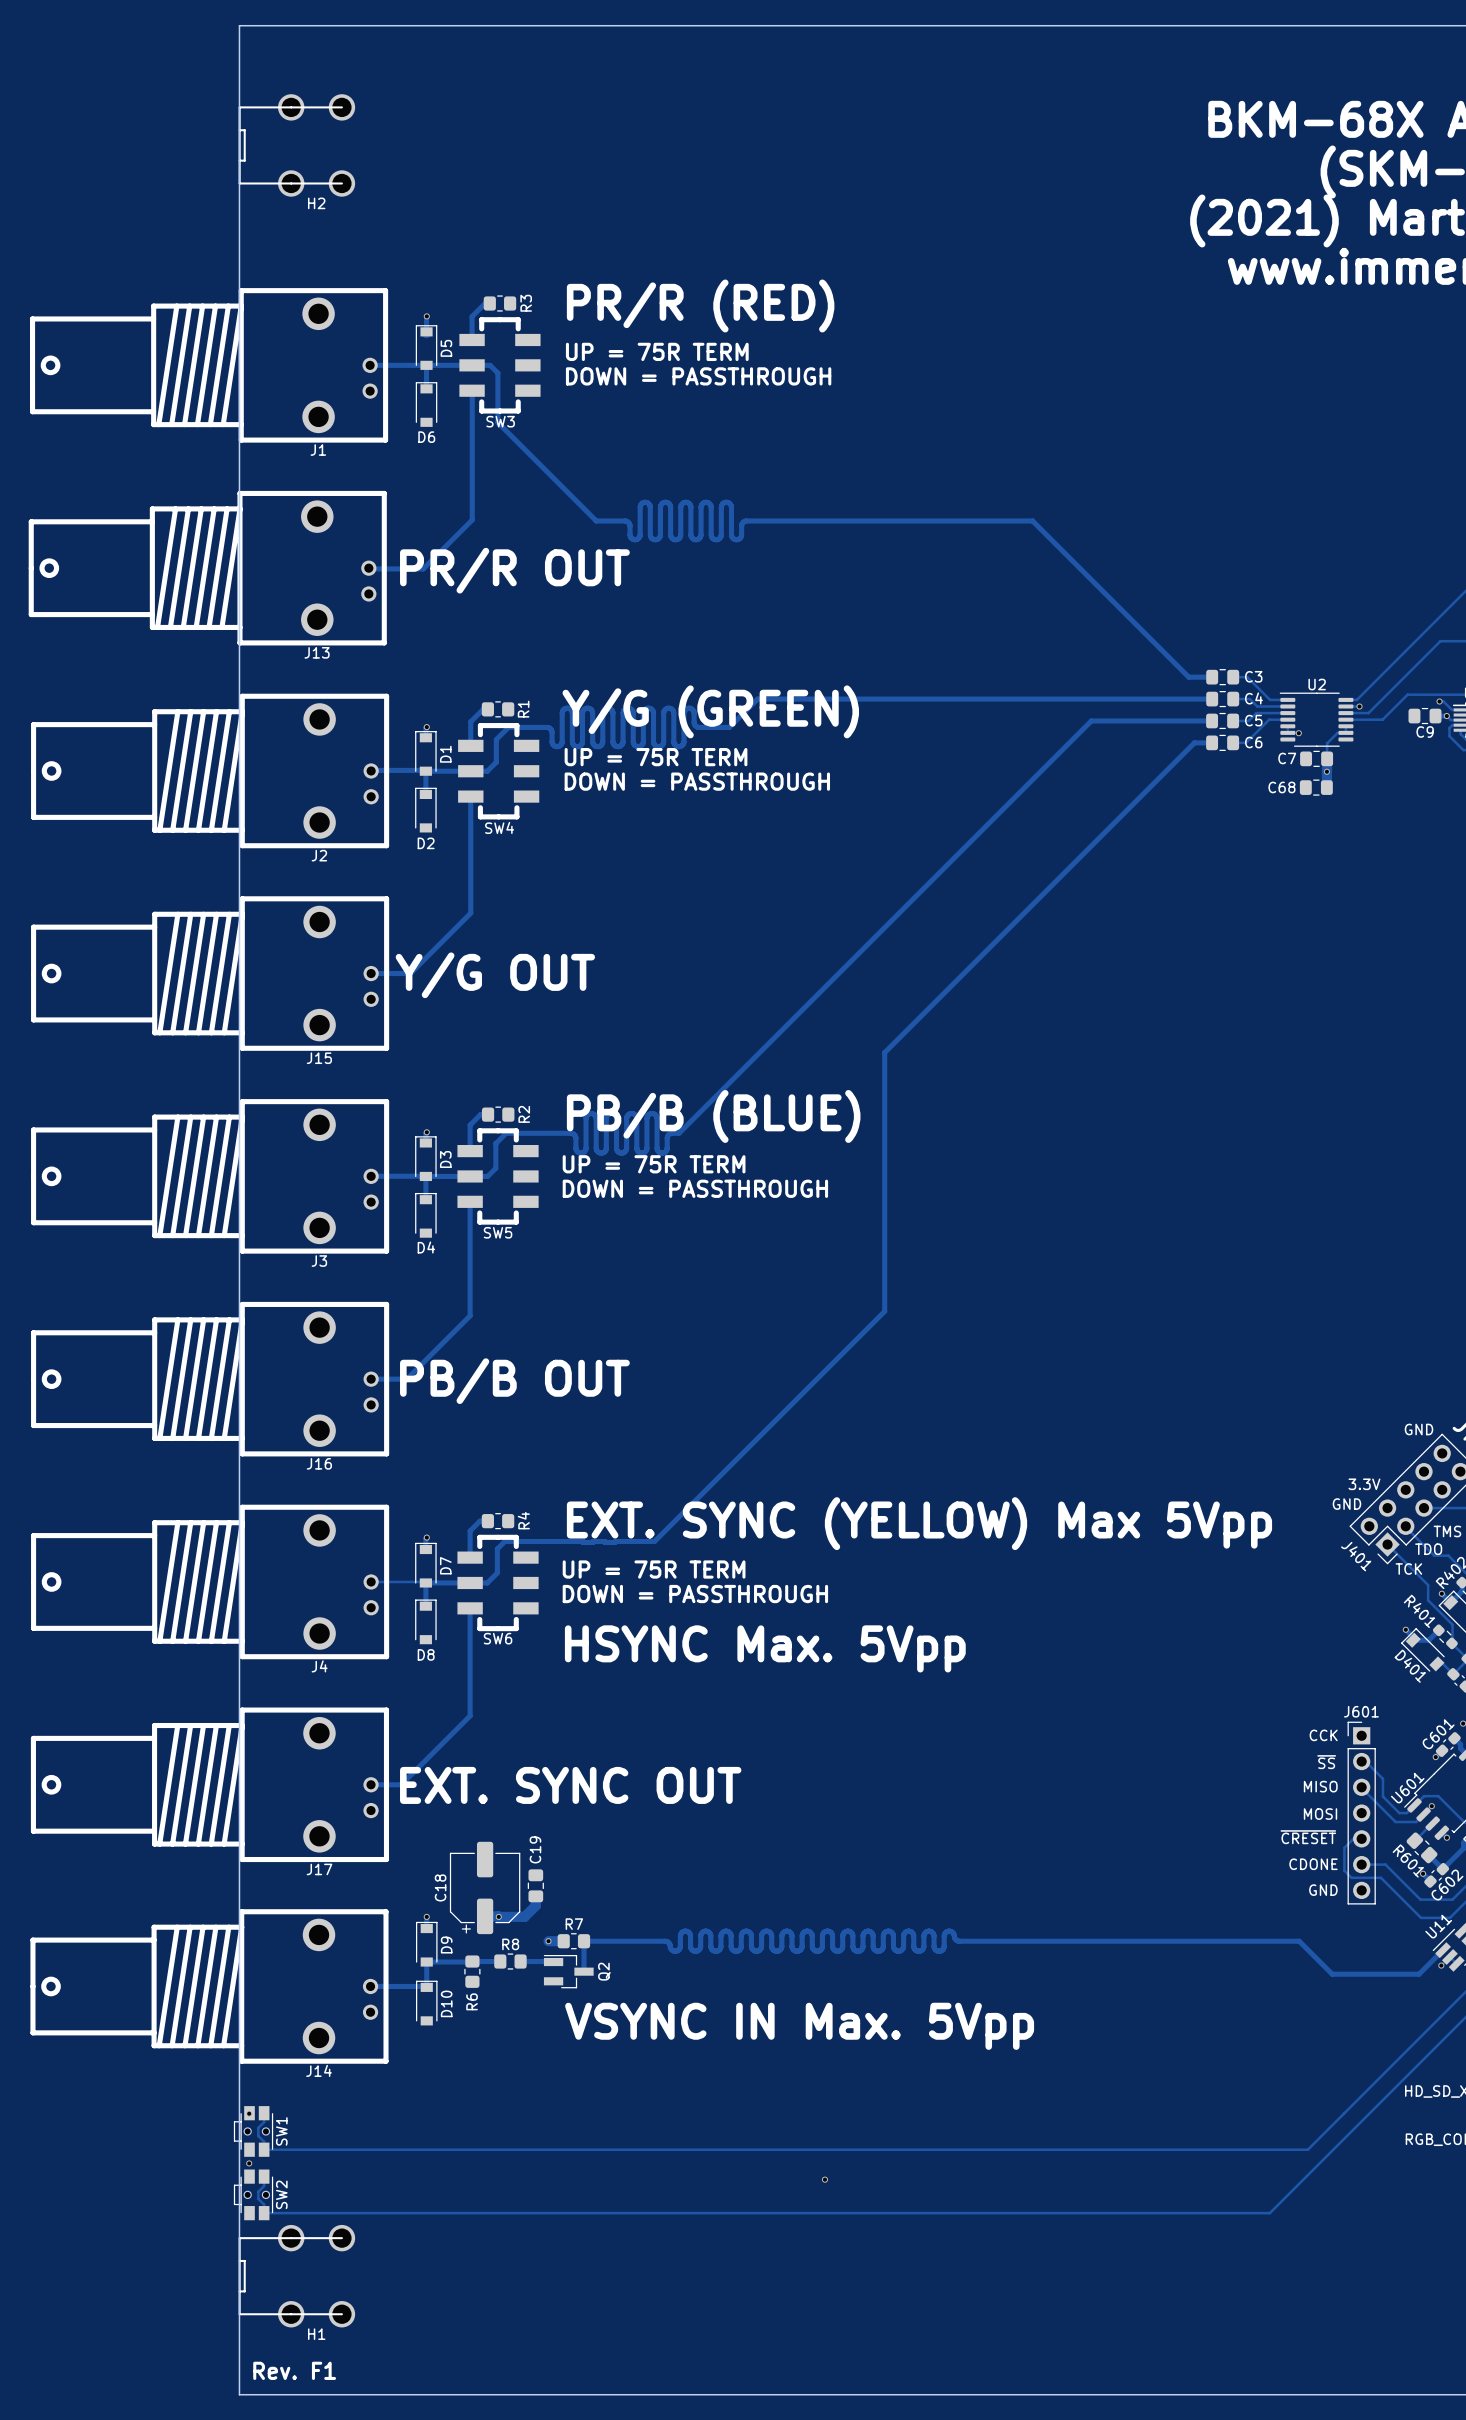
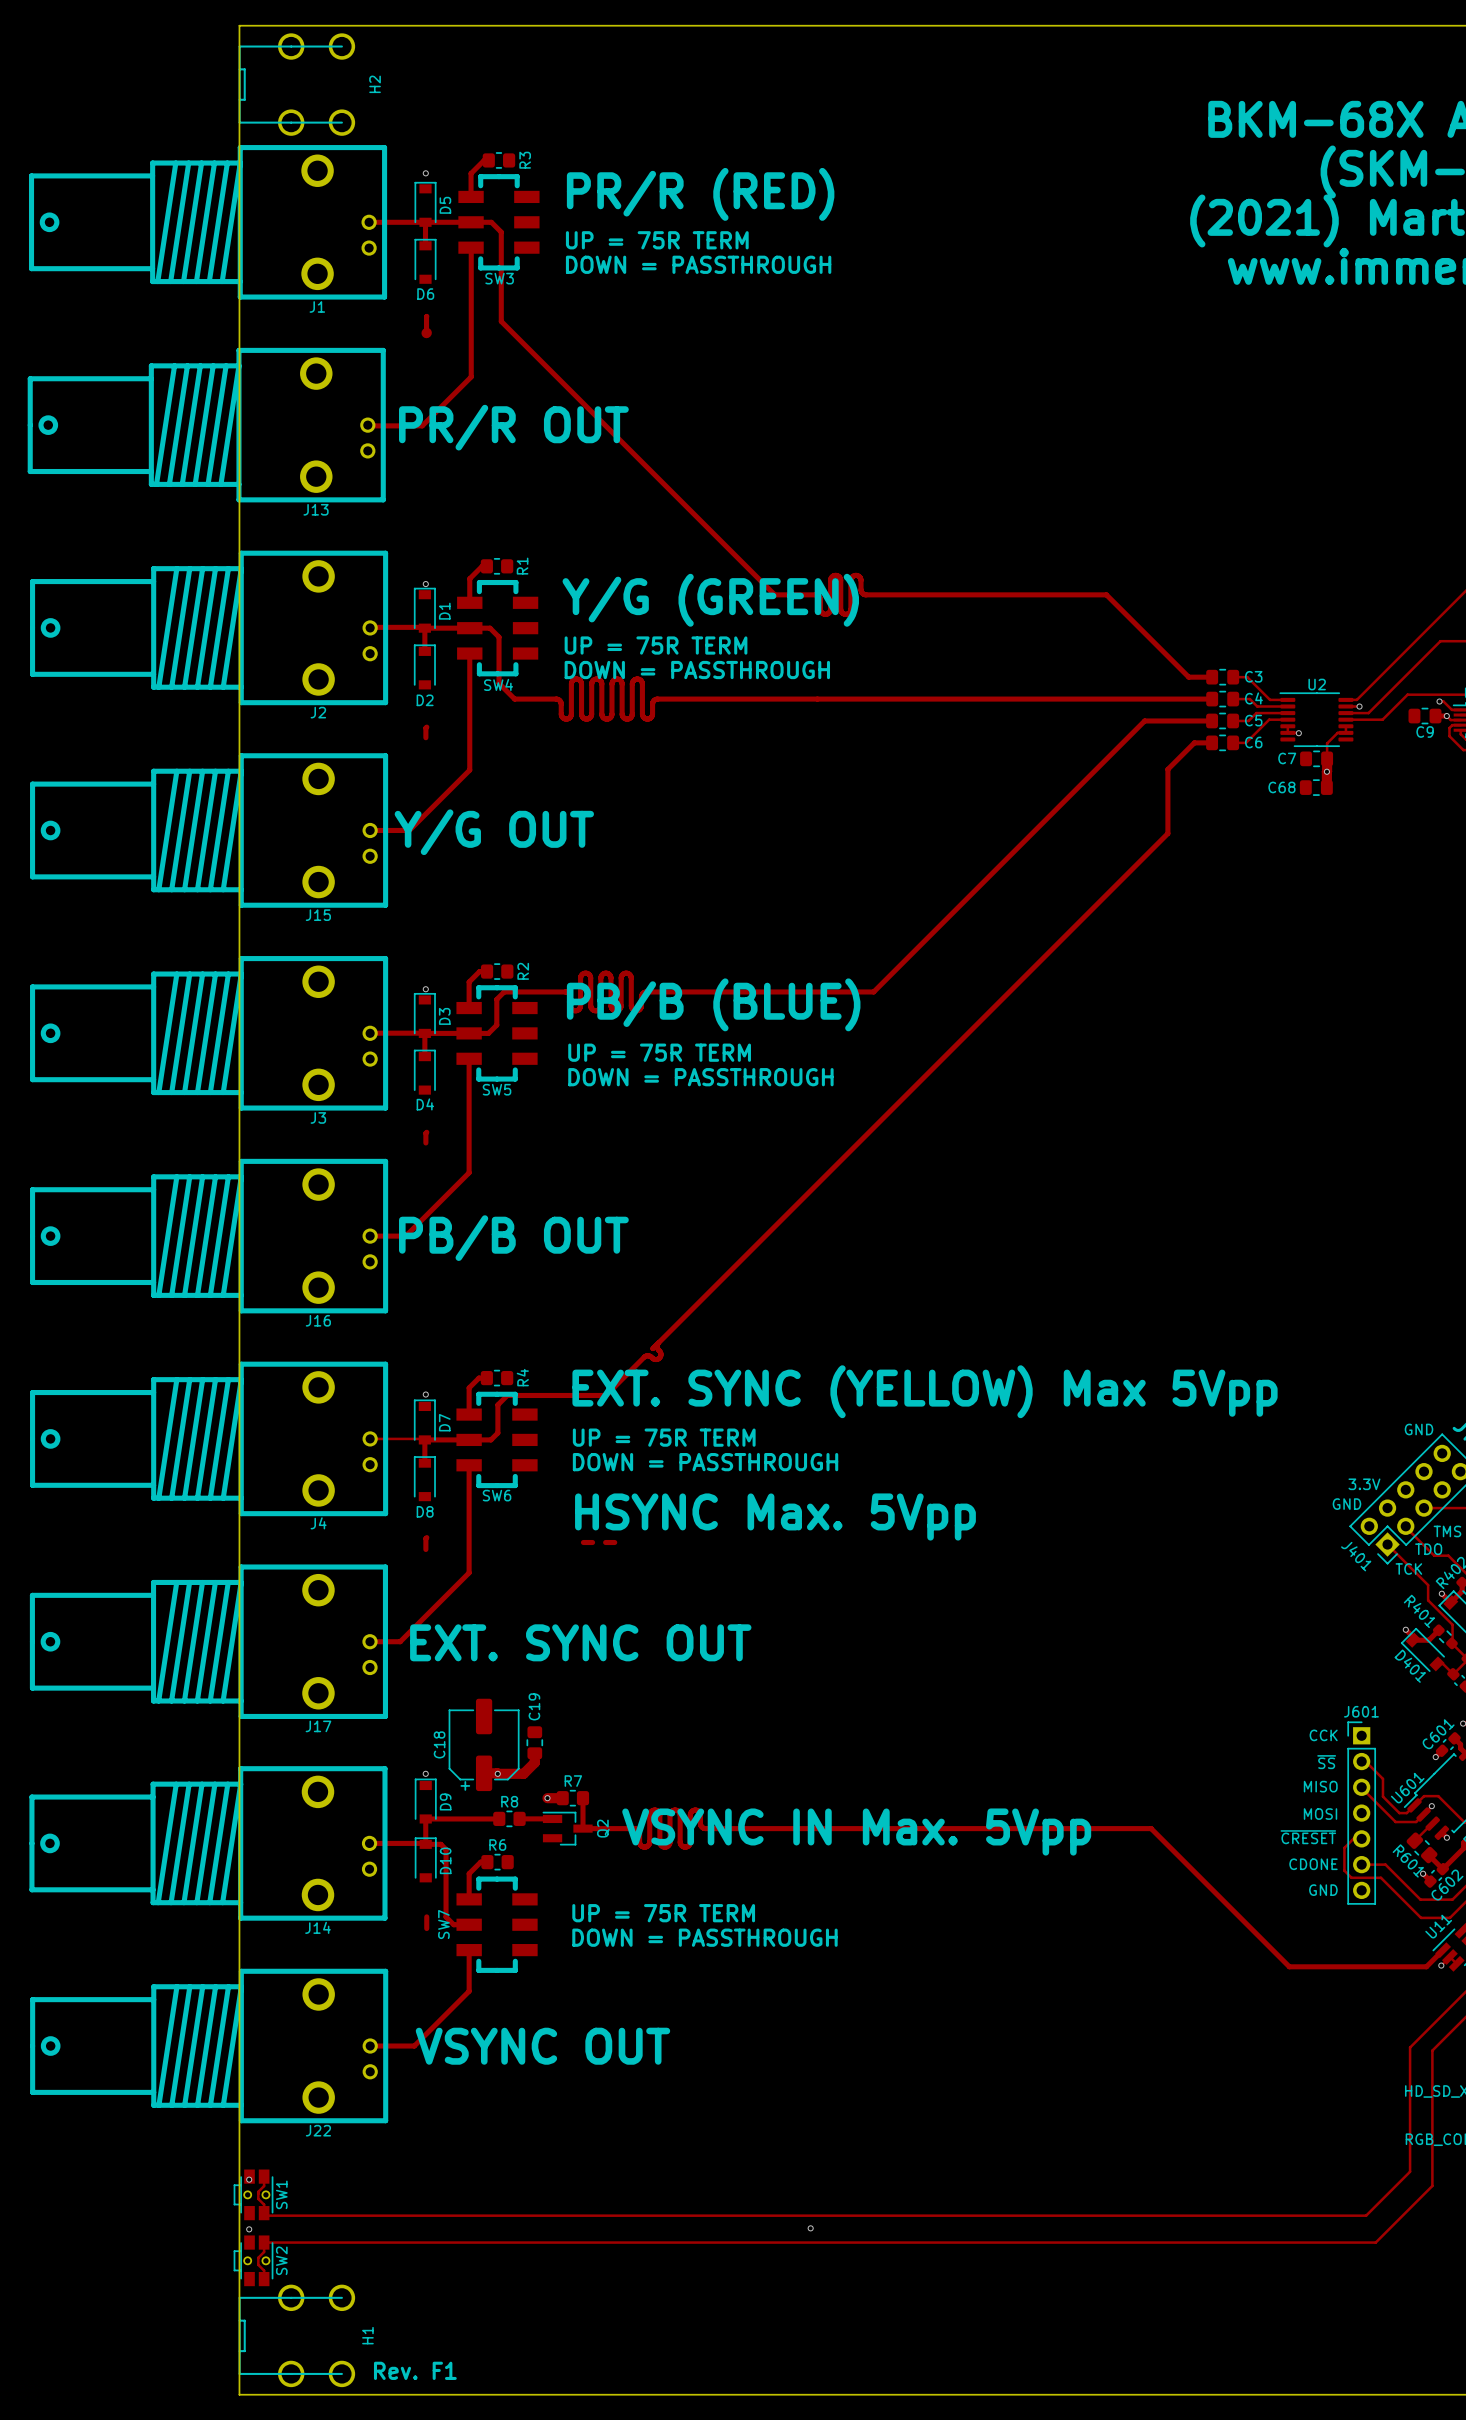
H2 position: (296, 145) -> (296, 84)
via: none -> (425, 173)
H2 name rotation: 0° (316, 203) -> 90° counterclockwise (375, 84)
H2 name position: H2 (316, 203) -> H2 (375, 84)
track: none -> (370, 222) (425, 222)
track: none -> (471, 222) (425, 222) (425, 245)
track: (489, 303) (485, 303) (472, 316) (472, 339) -> (488, 160) (484, 160) (471, 173) (471, 196)
R3 position: (499, 303) -> (498, 160)
text position: PR/R (RED) (700, 305) -> PR/R (RED) (700, 194)
via: (426, 316) -> none
D5 position: (426, 347) -> (425, 204)
text position: UP = 75R TERM (657, 351) -> UP = 75R TERM (657, 240)
J1 position: (209, 365) -> (208, 222)
track: (371, 365) (490, 365) (497, 373) (497, 422) (596, 521) (627, 521) (629, 524) (630, 536) (633, 539) (640, 535) (640, 506) (645, 502) (650, 506) (650, 535) (655, 539) (660, 535) (660, 506) (665, 502) (670, 506) (670, 535) (675, 539) (680, 535) (680, 506) (685, 502) (690, 506) (691, 535) (695, 539) (700, 535) (701, 506) (706, 502) (711, 506) (711, 535) (716, 539) (721, 535) (721, 506) (726, 502) (731, 506) (731, 535) (736, 539) (741, 536) (742, 523) (746, 521) (1032, 521) (1106, 594) -> (471, 222) (491, 222) (501, 232) (501, 321) (774, 594) (817, 595) (820, 598) (820, 611) (825, 614) (830, 610) (830, 579) (835, 575) (840, 579) (840, 610) (845, 614) (850, 610) (851, 579) (855, 575) (860, 579) (861, 591) (866, 594) (1106, 594)
track: (426, 365) (426, 388) -> none
SW3 position: (499, 365) -> (498, 222)
text position: DOWN = PASSTHROUGH (698, 376) -> DOWN = PASSTHROUGH (698, 264)
track: (472, 390) (472, 519) (423, 568) (371, 568) -> (471, 247) (471, 376) (422, 425) (370, 425)
D6 position: (426, 404) -> (425, 261)
J13 position: (207, 568) -> (206, 425)
text position: PR/R OUT (514, 570) -> PR/R OUT (513, 427)
via: none -> (425, 584)
track: (757, 699) (729, 727) (696, 726) (694, 723) (693, 711) (686, 708) (683, 713) (683, 742) (678, 746) (673, 742) (673, 712) (669, 708) (663, 712) (663, 742) (658, 746) (653, 742) (653, 713) (650, 708) (646, 708) (643, 712) (643, 742) (638, 746) (633, 742) (633, 713) (631, 709) (627, 708) (623, 711) (622, 742) (618, 746) (613, 742) (612, 711) (607, 708) (603, 710) (602, 742) (597, 746) (592, 742) (592, 712) (589, 708) (585, 708) (582, 713) (582, 742) (577, 746) (572, 742) (572, 712) (566, 708) (562, 712) (562, 741) (559, 746) (552, 743) (551, 731) (549, 727) (508, 727) (496, 739) (496, 762) (487, 771) (425, 771) -> (757, 699) (656, 699) (652, 703) (652, 716) (646, 719) (642, 715) (642, 682) (636, 679) (632, 682) (632, 715) (626, 719) (622, 715) (622, 682) (615, 679) (612, 682) (611, 715) (605, 719) (601, 715) (601, 682) (595, 679) (591, 682) (591, 715) (586, 719) (581, 715) (581, 682) (576, 679) (571, 682) (571, 715) (565, 719) (561, 716) (561, 703) (558, 699) (514, 699) (499, 683) (499, 637) (490, 628) (424, 628)
track: (487, 709) (483, 709) (470, 721) (470, 745) -> (486, 566) (482, 566) (469, 578) (469, 602)
R1 position: (498, 709) -> (497, 566)
text position: Y/G (GREEN) (710, 711) -> Y/G (GREEN) (710, 600)
track: (1144, 720) (1091, 720) (679, 1133) (668, 1135) (665, 1152) (659, 1152) (657, 1149) (656, 1117) (652, 1113) (647, 1117) (645, 1151) (641, 1153) (637, 1150) (636, 1117) (631, 1113) (626, 1117) (626, 1149) (623, 1152) (618, 1152) (616, 1148) (616, 1117) (611, 1113) (606, 1117) (606, 1149) (603, 1152) (599, 1152) (596, 1148) (596, 1117) (591, 1113) (586, 1117) (586, 1148) (583, 1152) (576, 1150) (575, 1137) (571, 1133) (506, 1133) (495, 1143) (495, 1168) (487, 1176) (425, 1176) -> (1144, 720) (873, 991) (646, 991) (641, 994) (641, 1006) (636, 1010) (631, 1006) (631, 977) (626, 973) (621, 977) (621, 1006) (616, 1010) (611, 1006) (610, 977) (605, 973) (600, 977) (600, 1006) (595, 1010) (590, 1006) (590, 977) (585, 973) (580, 977) (580, 1005) (577, 1010) (570, 1007) (570, 995) (566, 992) (504, 991) (496, 999) (496, 1025) (488, 1033) (424, 1033)
via: (426, 727) -> none
D1 position: (425, 753) -> (424, 610)
text position: UP = 75R TERM (656, 757) -> UP = 75R TERM (656, 645)
track: (1167, 769) (884, 1052) (884, 1311) (654, 1541) (615, 1541) -> (1167, 769) (1167, 833) (652, 1348)
J2 position: (210, 770) -> (209, 627)
track: (371, 770) (425, 771) -> (370, 627) (424, 628)
track: (425, 771) (425, 794) -> (424, 628) (424, 651)
SW4 position: (498, 771) -> (497, 628)
text position: DOWN = PASSTHROUGH (697, 781) -> DOWN = PASSTHROUGH (697, 670)
track: (470, 796) (470, 913) (410, 973) (371, 973) -> (469, 653) (469, 770) (409, 830) (370, 830)
D2 position: (425, 810) -> (424, 667)
J15 position: (210, 973) -> (209, 830)
text position: Y/G OUT (495, 975) -> Y/G OUT (494, 832)
via: none -> (425, 989)
track: (488, 1114) (480, 1114) (470, 1125) (470, 1151) -> (487, 971) (479, 971) (469, 982) (469, 1008)
R2 position: (498, 1114) -> (497, 971)
text position: PB/B (BLUE) (713, 1116) -> PB/B (BLUE) (713, 1004)
via: (426, 1132) -> none
D3 position: (425, 1158) -> (424, 1015)
text position: UP = 75R TERM (654, 1164) -> UP = 75R TERM (659, 1052)
J3 position: (210, 1176) -> (209, 1033)
track: (371, 1176) (425, 1176) -> (370, 1033) (424, 1033)
track: (425, 1176) (425, 1199) -> (424, 1033) (424, 1056)
SW5 position: (498, 1176) -> (497, 1033)
text position: DOWN = PASSTHROUGH (695, 1188) -> DOWN = PASSTHROUGH (700, 1077)
track: (470, 1201) (470, 1315) (406, 1379) (371, 1379) -> (469, 1058) (469, 1172) (405, 1236) (370, 1236)
D4 position: (425, 1215) -> (424, 1072)
track: none -> (658, 1342) (657, 1346) (660, 1353) (659, 1358) (655, 1359) (649, 1355) (645, 1356) (605, 1395) (507, 1395) (497, 1404) (497, 1433) (490, 1439) (424, 1439)
J16 position: (210, 1379) -> (209, 1236)
text position: PB/B OUT (514, 1381) -> PB/B OUT (513, 1238)
via: none -> (425, 1394)
track: (487, 1521) (479, 1521) (470, 1530) (470, 1557) -> (486, 1378) (478, 1378) (469, 1387) (469, 1414)
R4 position: (498, 1521) -> (497, 1378)
text position: EXT. SYNC (YELLOW) Max 5Vpp (919, 1523) -> EXT. SYNC (YELLOW) Max 5Vpp (925, 1391)
via: (426, 1537) -> none
track: (582, 1541) (504, 1541) (497, 1548) (497, 1572) (487, 1582) (425, 1582) -> none
track: (593, 1541) (604, 1541) -> none
D7 position: (425, 1565) -> (424, 1422)
text position: UP = 75R TERM (654, 1569) -> UP = 75R TERM (664, 1437)
J4 position: (210, 1581) -> (209, 1438)
track: (371, 1581) (425, 1582) -> (370, 1438) (424, 1439)
track: (425, 1582) (425, 1606) -> (424, 1439) (424, 1463)
SW6 position: (498, 1582) -> (497, 1439)
text position: DOWN = PASSTHROUGH (695, 1594) -> DOWN = PASSTHROUGH (705, 1462)
track: (470, 1608) (470, 1715) (401, 1784) (371, 1784) -> (469, 1465) (469, 1572) (400, 1641) (370, 1641)
D8 position: (425, 1621) -> (424, 1478)
text position: HSYNC Max. 5Vpp (765, 1648) -> HSYNC Max. 5Vpp (775, 1517)
via: none -> (425, 1773)
via: none -> (497, 1773)
J17 position: (209, 1784) -> (208, 1641)
text position: EXT. SYNC OUT (570, 1785) -> EXT. SYNC OUT (580, 1642)
via: none -> (547, 1798)
track: none -> (499, 1818) (425, 1818) (425, 1844)
track: none -> (519, 1818) (552, 1818)
track: none -> (369, 1843) (425, 1844)
track: none -> (425, 1844) (440, 1844) (446, 1849) (446, 1917) (453, 1924) (469, 1924)
track: none -> (487, 1862) (480, 1862) (469, 1873) (469, 1899)
C19 position: (535, 1885) -> (534, 1742)
C18 position: (485, 1887) -> (484, 1744)
track: (535, 1896) (535, 1905) (524, 1916) (485, 1916) -> (534, 1753) (534, 1762) (523, 1773) (484, 1773)
text: none -> UP = 75R TERM (663, 1913)
via: (426, 1916) -> none
via: (498, 1916) -> none
SW7: none -> (497, 1924)
text: none -> DOWN = PASSTHROUGH (704, 1937)
track: (548, 1941) (563, 1941) -> (547, 1798) (562, 1798)
via: (548, 1941) -> none
R7 position: (573, 1941) -> (572, 1798)
D9 position: (426, 1944) -> (425, 1801)
track: none -> (469, 1950) (469, 1991) (414, 2046) (370, 2046)
track: (675, 1951) (680, 1947) (680, 1934) (685, 1931) (690, 1934) (690, 1947) (695, 1951) (700, 1948) (700, 1935) (705, 1931) (710, 1934) (710, 1947) (715, 1951) (720, 1948) (721, 1935) (726, 1931) (730, 1934) (731, 1947) (736, 1951) (740, 1948) (741, 1935) (746, 1931) (750, 1934) (751, 1947) (756, 1951) (761, 1948) (761, 1935) (766, 1931) (771, 1934) (771, 1947) (776, 1951) (781, 1948) (781, 1935) (786, 1931) (791, 1934) (792, 1947) (795, 1951) (801, 1948) (802, 1935) (807, 1931) (811, 1934) (812, 1947) (816, 1951) (821, 1948) (822, 1935) (827, 1931) (832, 1934) (832, 1947) (836, 1951) (842, 1948) (842, 1935) (847, 1931) (852, 1934) (853, 1947) (856, 1951) (862, 1948) (863, 1935) (868, 1931) (872, 1934) (873, 1947) (877, 1951) (882, 1948) (883, 1935) (888, 1931) (892, 1934) (893, 1947) (896, 1950) (903, 1948) (903, 1935) (908, 1931) (913, 1935) (914, 1949) (921, 1950) (923, 1947) (924, 1934) (928, 1931) (933, 1935) (934, 1948) (940, 1951) (944, 1947) (944, 1934) (949, 1931) (959, 1941) (1299, 1941) (1332, 1974) (1419, 1974) (1426, 1966) -> (583, 1798) (583, 1828) (635, 1828) (639, 1832) (640, 1844) (644, 1847) (649, 1843) (649, 1814) (654, 1810) (659, 1814) (660, 1843) (664, 1847) (669, 1843) (670, 1814) (675, 1810) (680, 1814) (680, 1843) (685, 1847) (690, 1843) (690, 1814) (695, 1810) (699, 1812) (700, 1825) (705, 1828) (1151, 1828) (1289, 1966) (1426, 1966)
track: (675, 1951) (665, 1941) (584, 1941) (584, 1971) -> none
track: (500, 1961) (426, 1962) (426, 1987) (370, 1986) -> none
R8 position: (510, 1961) -> (509, 1818)
track: (520, 1961) (553, 1962) -> none
R6 rotation: 0° (472, 1971) -> 90° clockwise (497, 1862)
R6 position: (472, 1971) -> (497, 1862)
Q2 position: (568, 1971) -> (567, 1828)
J14 position: (209, 1986) -> (208, 1843)
R6 name position: R6 (472, 2001) -> R6 (497, 1845)
D10 position: (426, 2003) -> (425, 1860)
text position: VSYNC IN Max. 5Vpp (799, 2026) -> VSYNC IN Max. 5Vpp (856, 1832)
J22: none -> (209, 2046)
text: none -> VSYNC OUT (542, 2046)
track: (1410, 2047) (1307, 2149) (264, 2149) (264, 2141) (258, 2136) (258, 2127) (264, 2122) (264, 2113) -> none
track: (1432, 2050) (1269, 2213) (264, 2213) -> (1410, 2047) (1410, 2171) (1366, 2215) (264, 2215) (264, 2213)
track: none -> (1432, 2050) (1432, 2185) (1375, 2242) (264, 2242) (264, 2251) (258, 2257) (258, 2264) (264, 2270) (264, 2279)
via: (249, 2113) -> none
SW1: (253, 2131) -> none
via position: (249, 2163) -> (249, 2179)
via position: (824, 2179) -> (810, 2228)
SW2 name: SW2 (281, 2194) -> SW1 (281, 2194)
via: none -> (249, 2229)
SW2: none -> (253, 2260)
H1 position: (296, 2276) -> (296, 2335)
H1 name rotation: 0° (316, 2334) -> 90° counterclockwise (367, 2335)
H1 name position: H1 (316, 2334) -> H1 (367, 2335)
text position: Rev. F1 (294, 2370) -> Rev. F1 (415, 2370)

